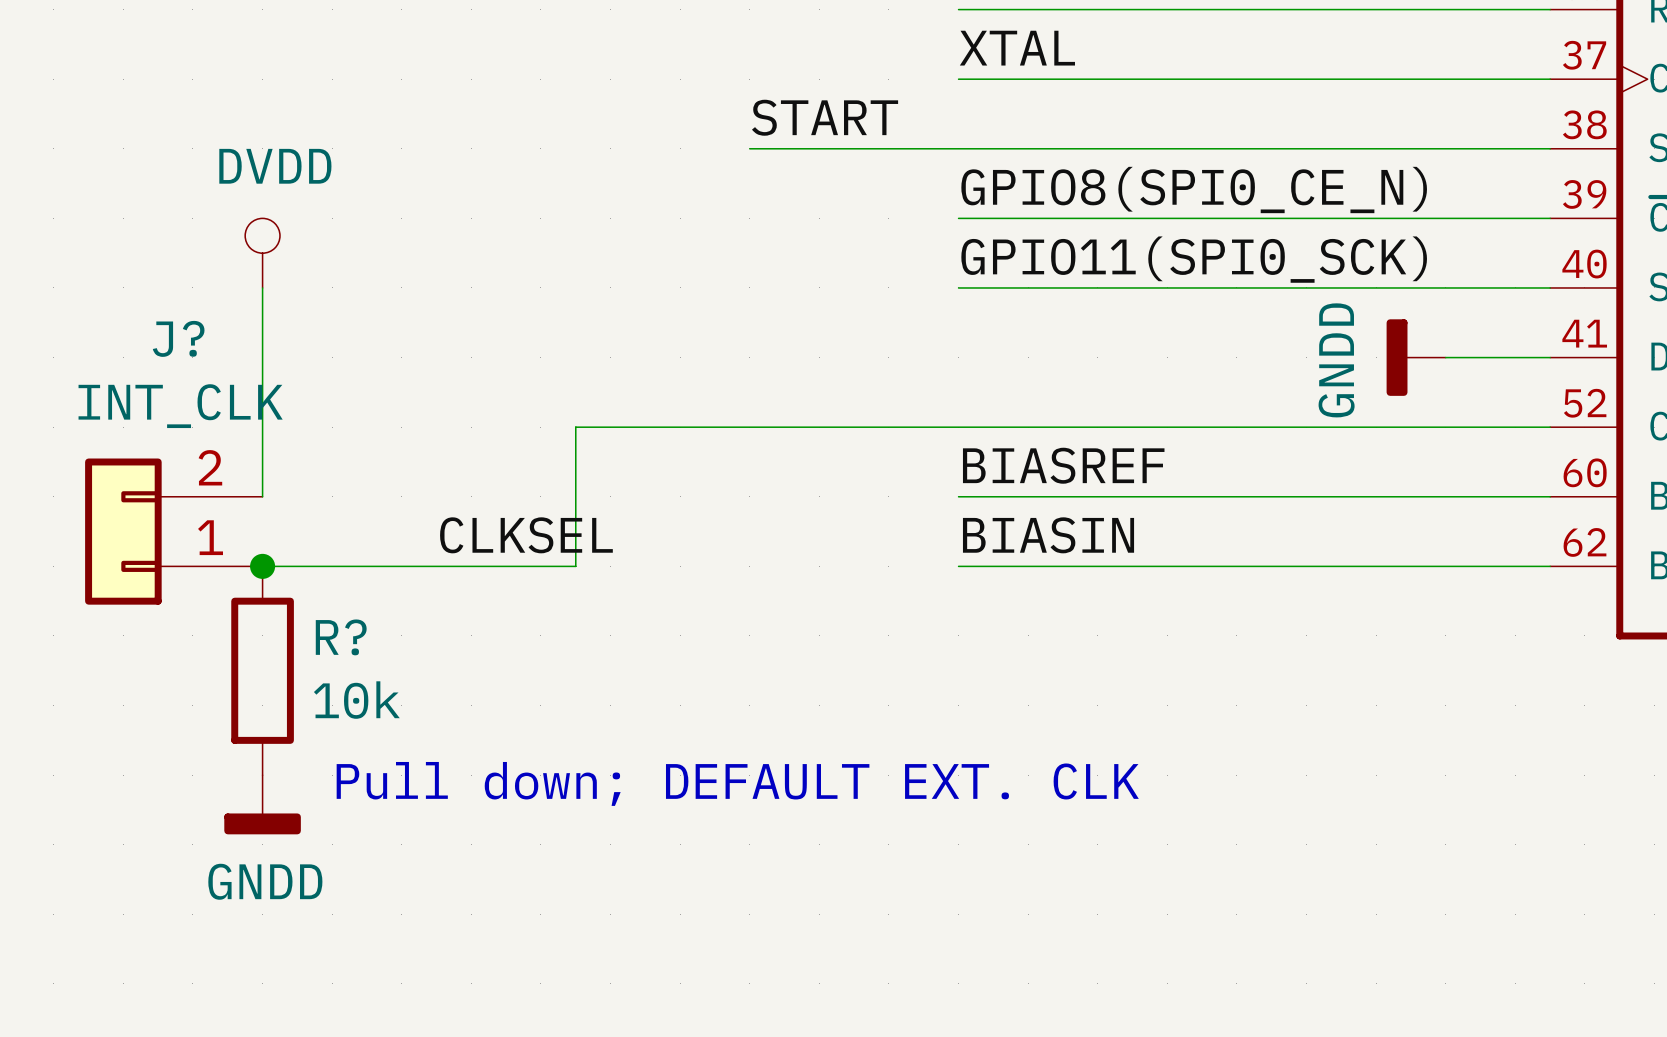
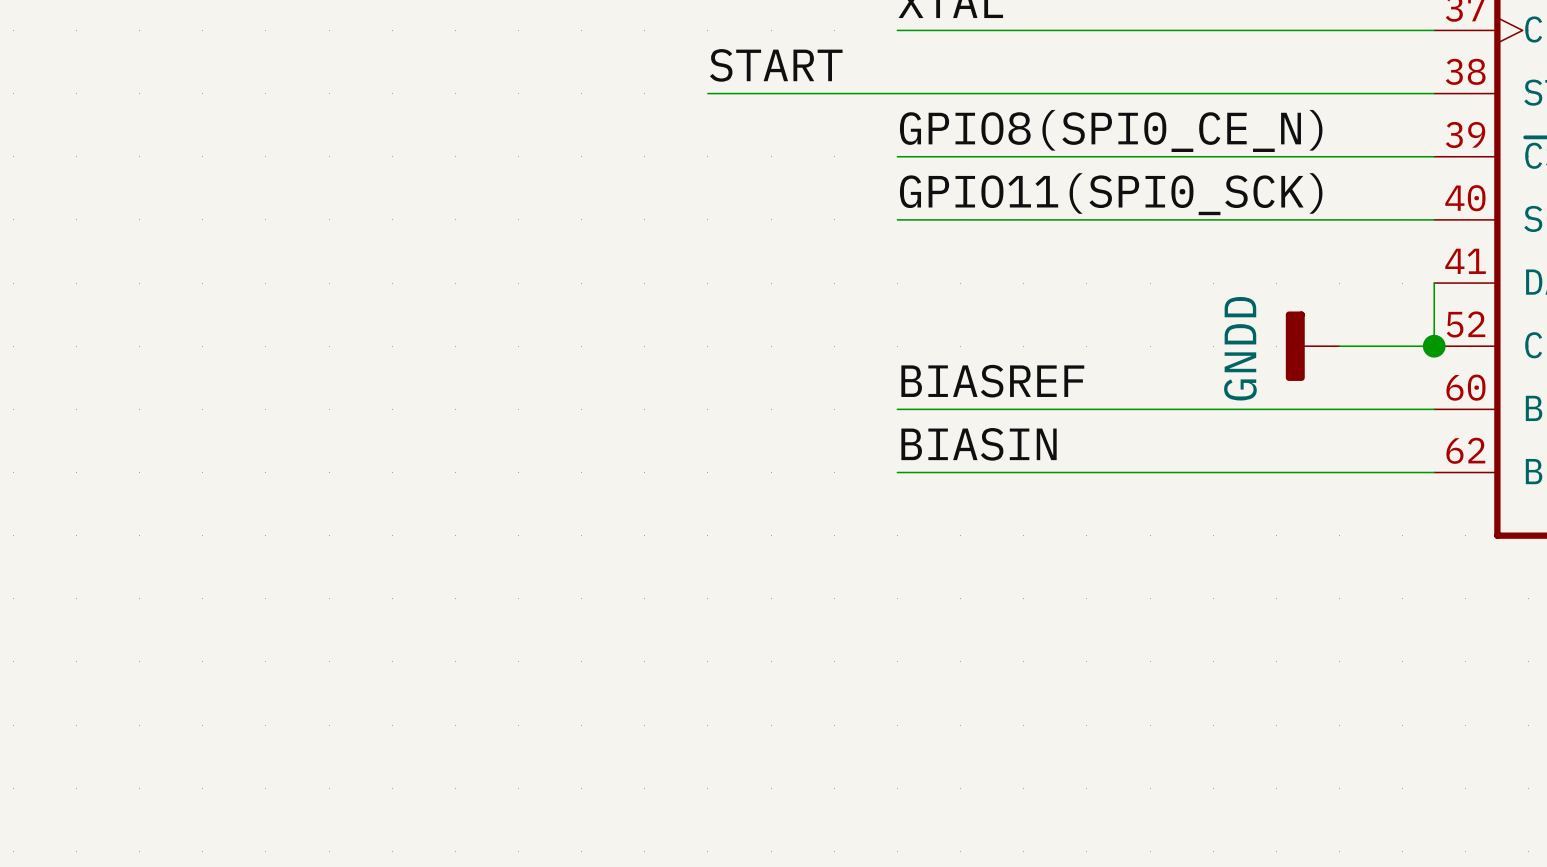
power symbol: DVDD (262, 253) -> none
wire: (262, 287) (262, 496) -> none
power symbol position: GNDD (1416, 357) -> GNDD (1312, 346)
wire: (1445, 357) (1550, 357) -> (1434, 346) (1434, 283)
wire: (1445, 427) (575, 427) (575, 566) (262, 566) -> none
junction: none -> (1434, 346)
J?: INT_CLK (173, 531) -> none
label: CLKSEL (526, 535) -> none
junction: (262, 566) -> none
R?: 10k (262, 670) -> none
text: Pull down; DEFAULT EXT. CLK (737, 783) -> none
power symbol: GNDD (262, 804) -> none

